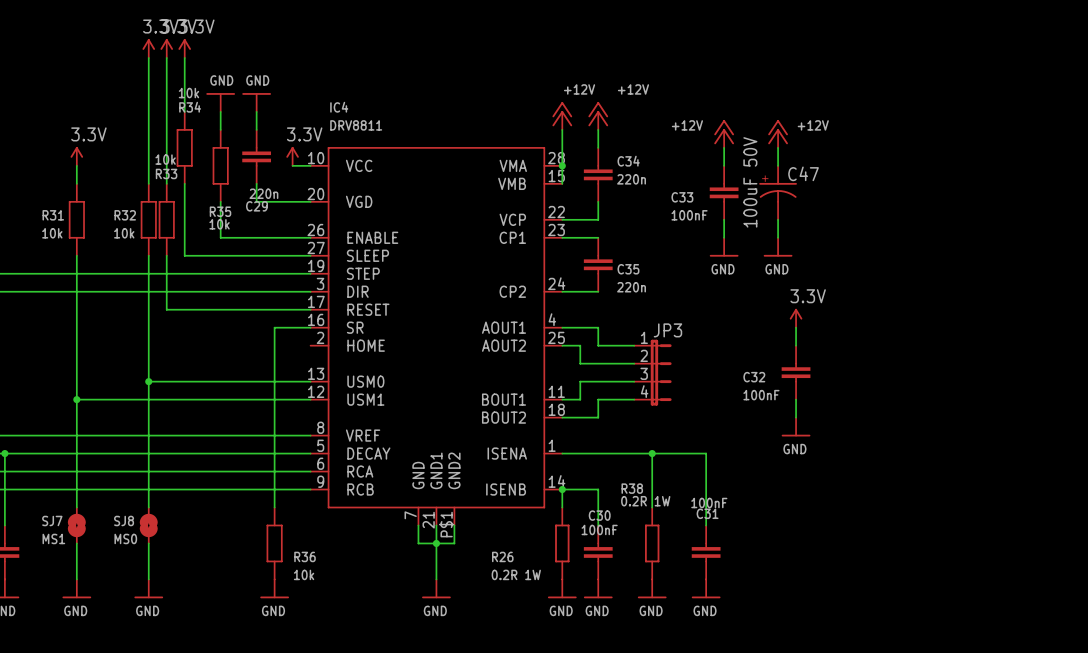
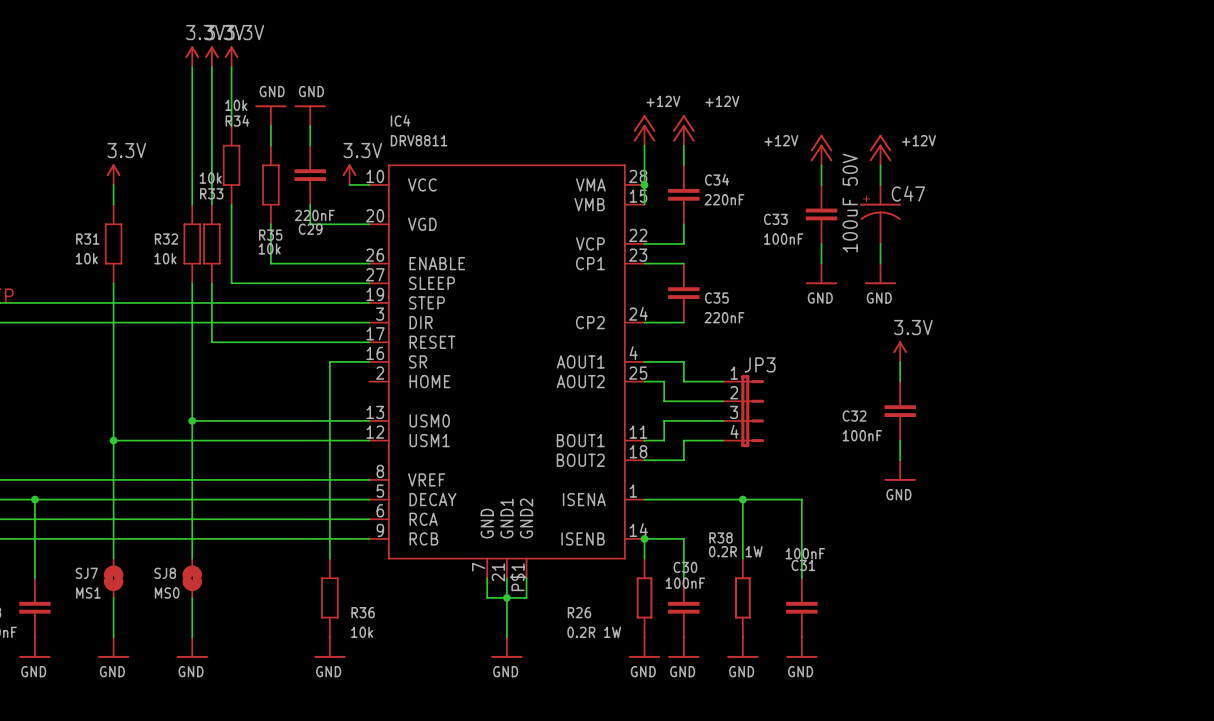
C34 value: 220n (631, 179) -> 220nF (724, 199)
C29 value: 220n (263, 193) -> 220nF (314, 215)
C35 value: 220n (631, 287) -> 220nF (724, 317)

